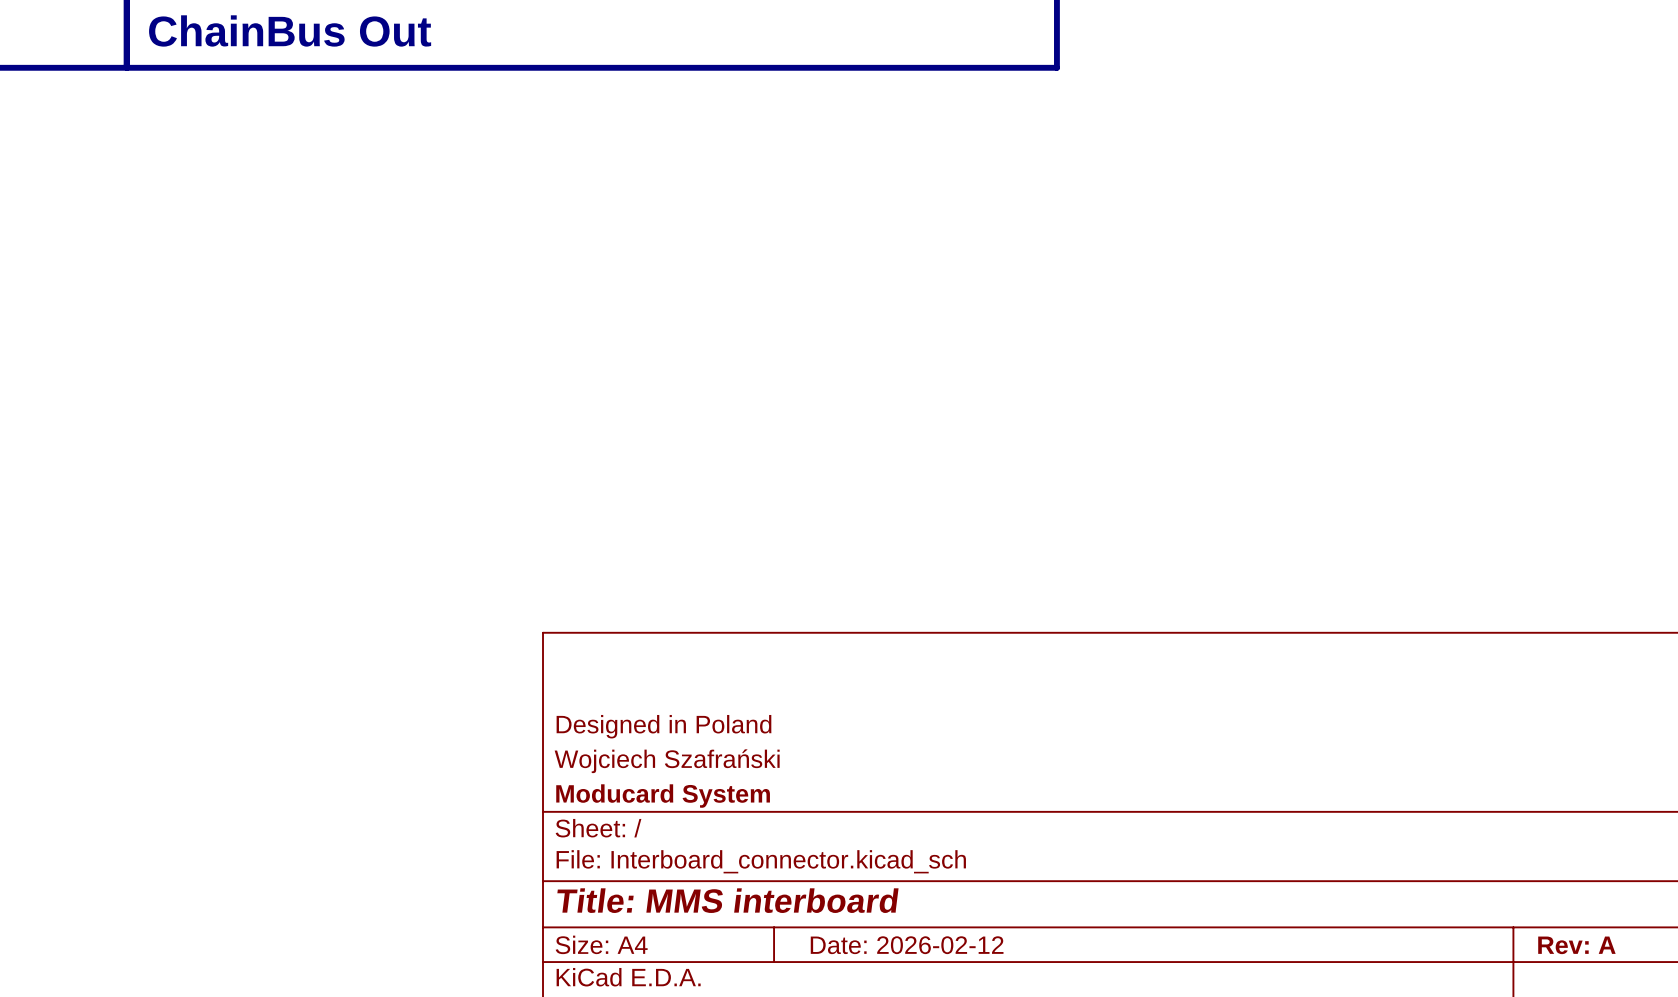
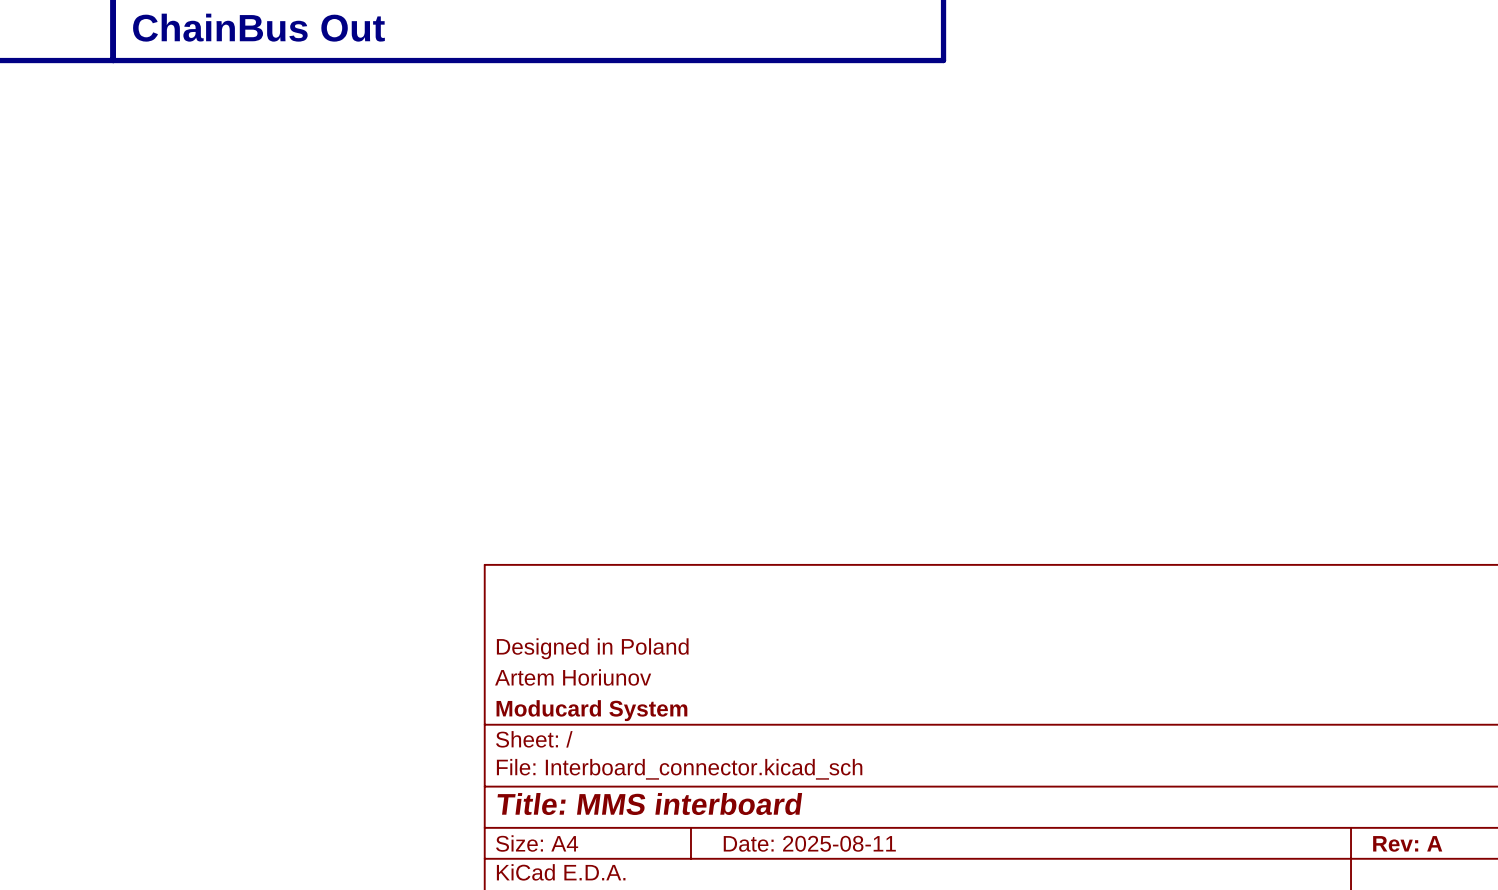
title block: Wojciech Szafrański (667, 761) -> Artem Horiunov (573, 677)
title block: Date: 2026-02-12 (907, 945) -> Date: 2025-08-11 (809, 843)

